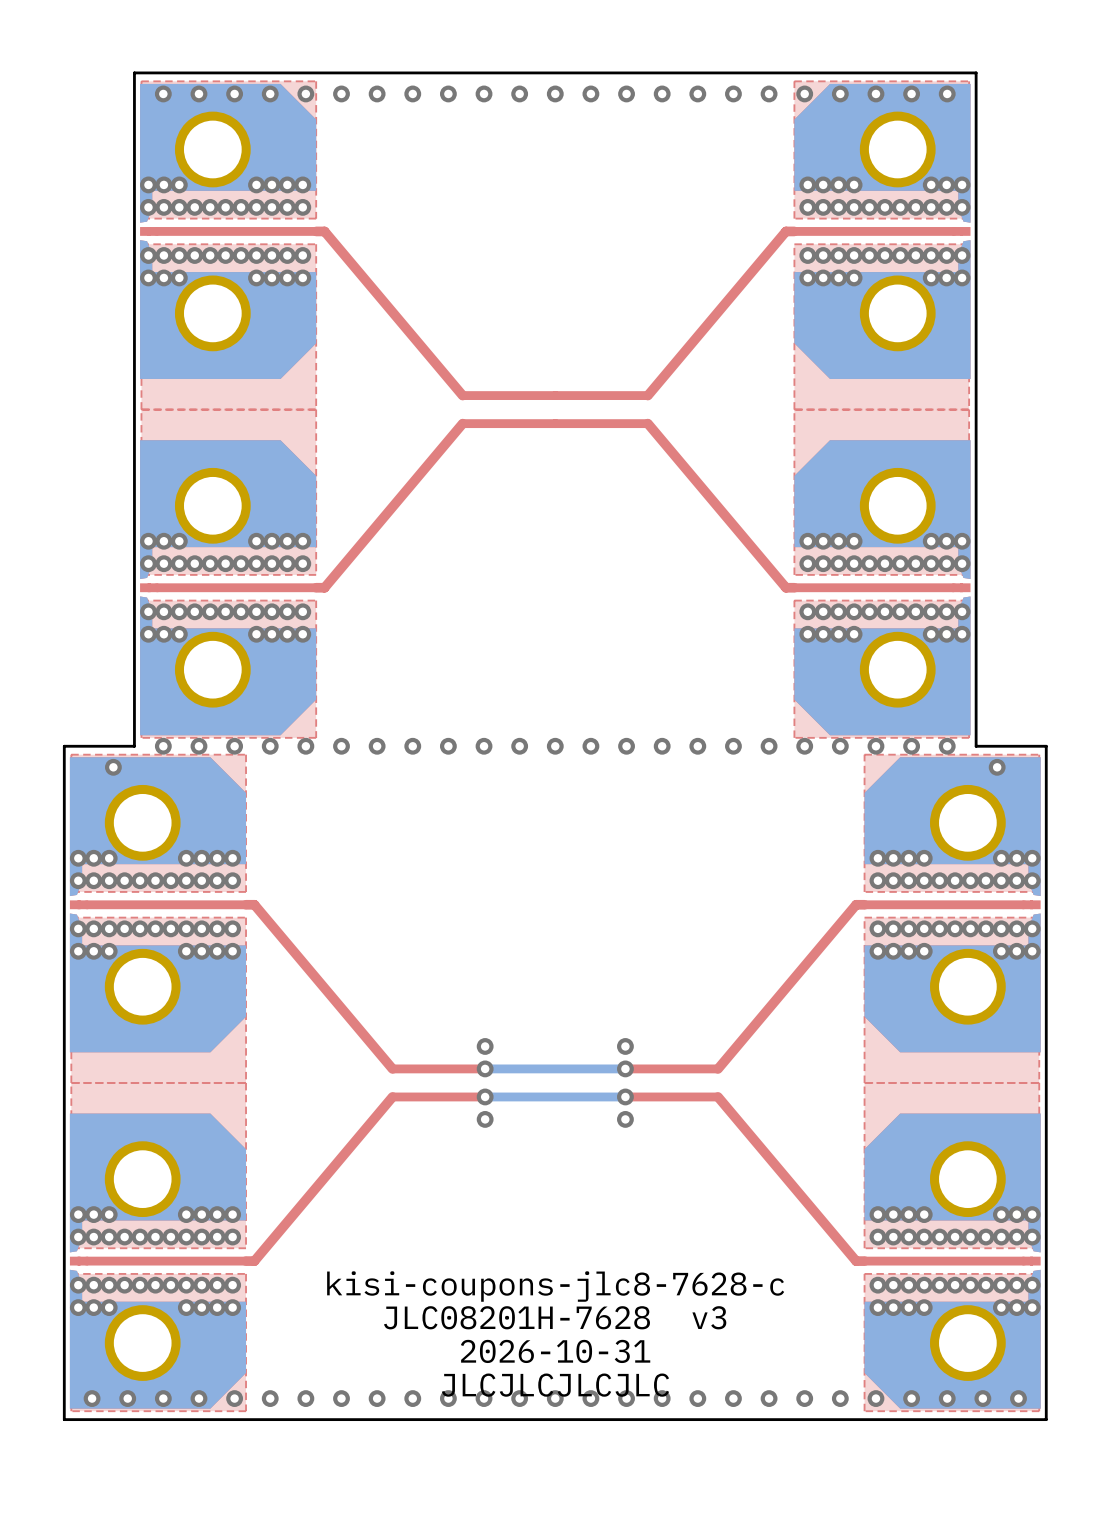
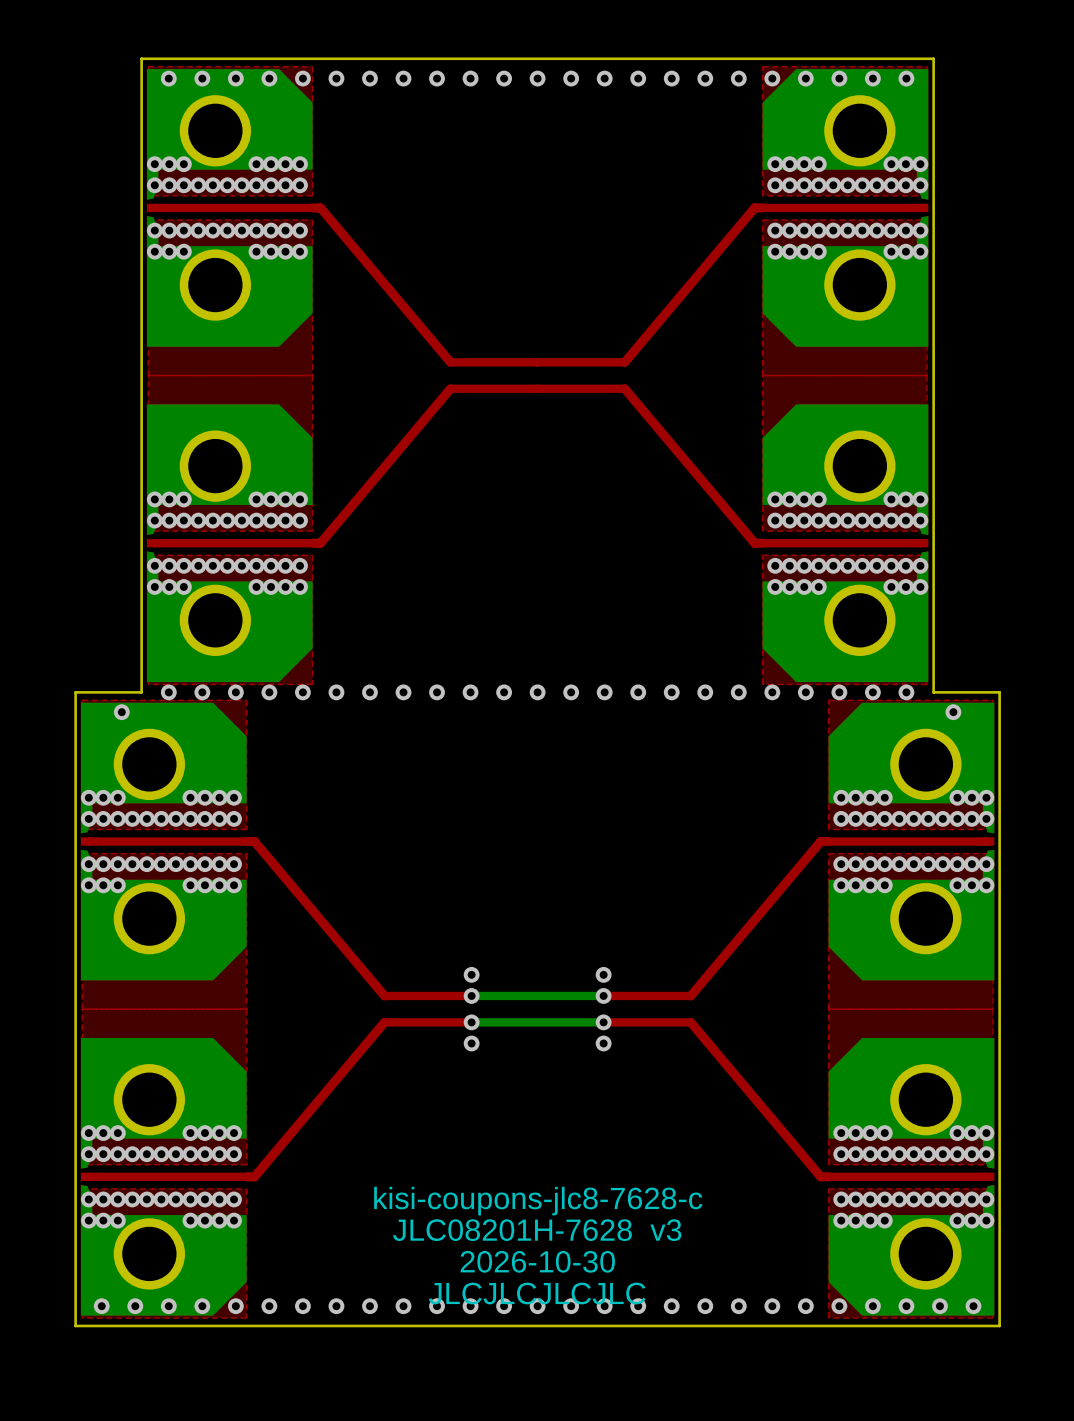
text: 2026-10-31 (555, 1351) -> 2026-10-30 (537, 1261)

